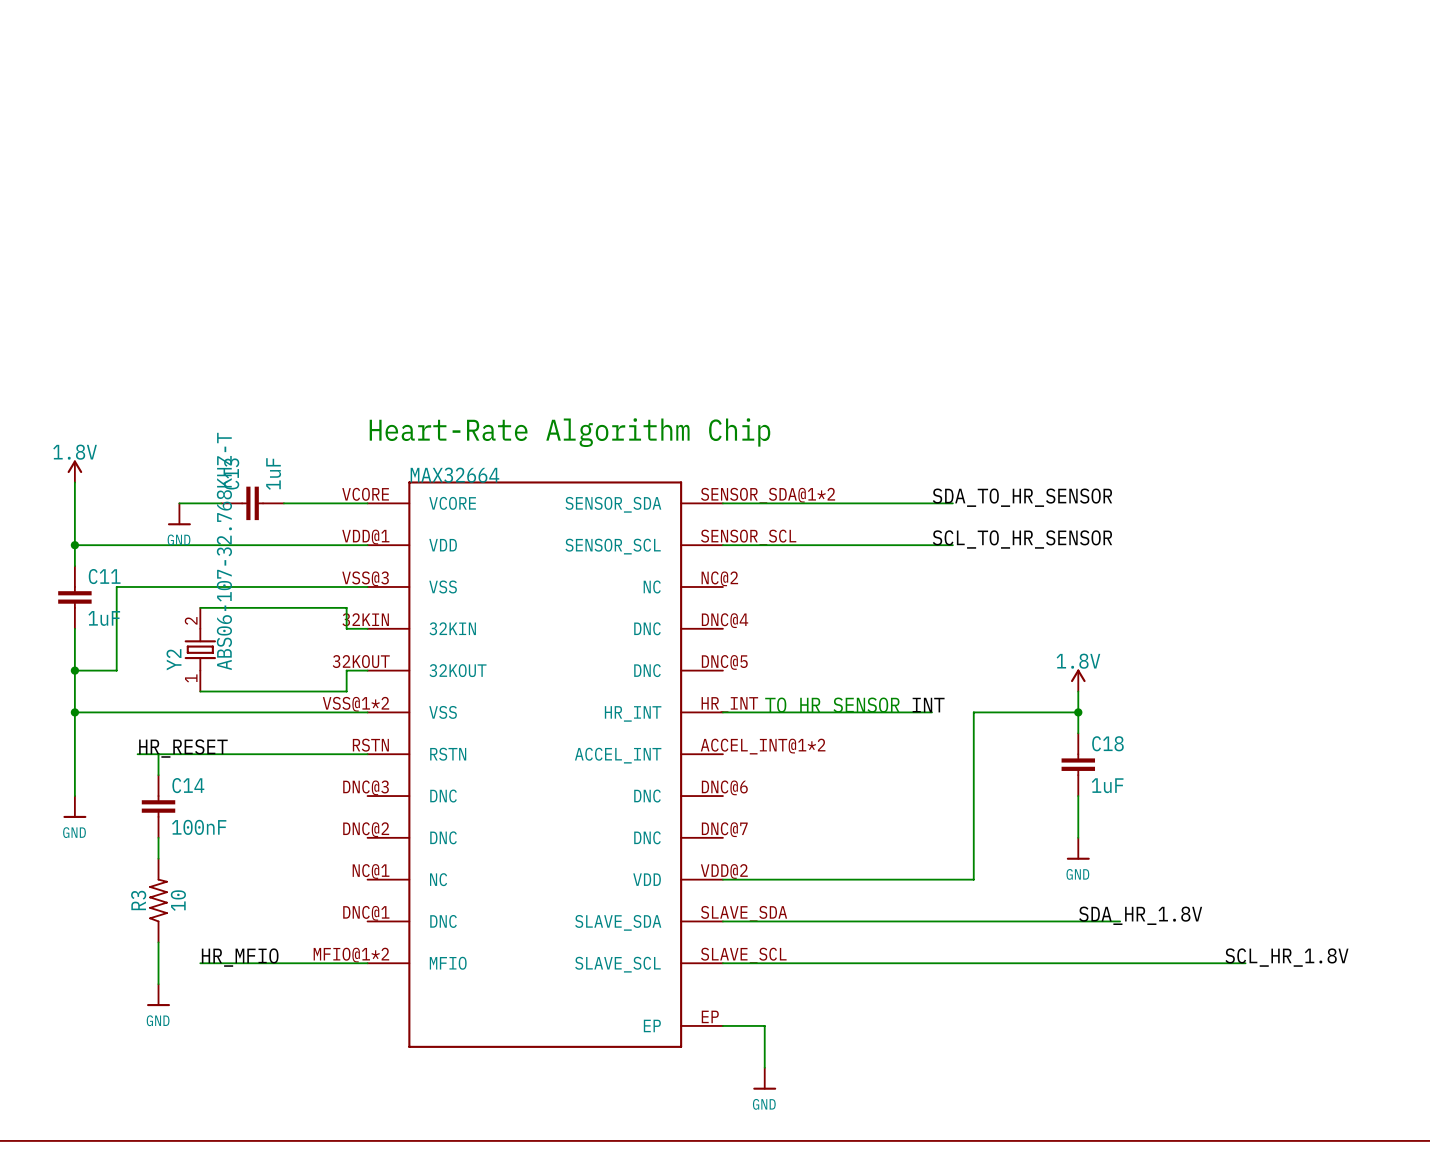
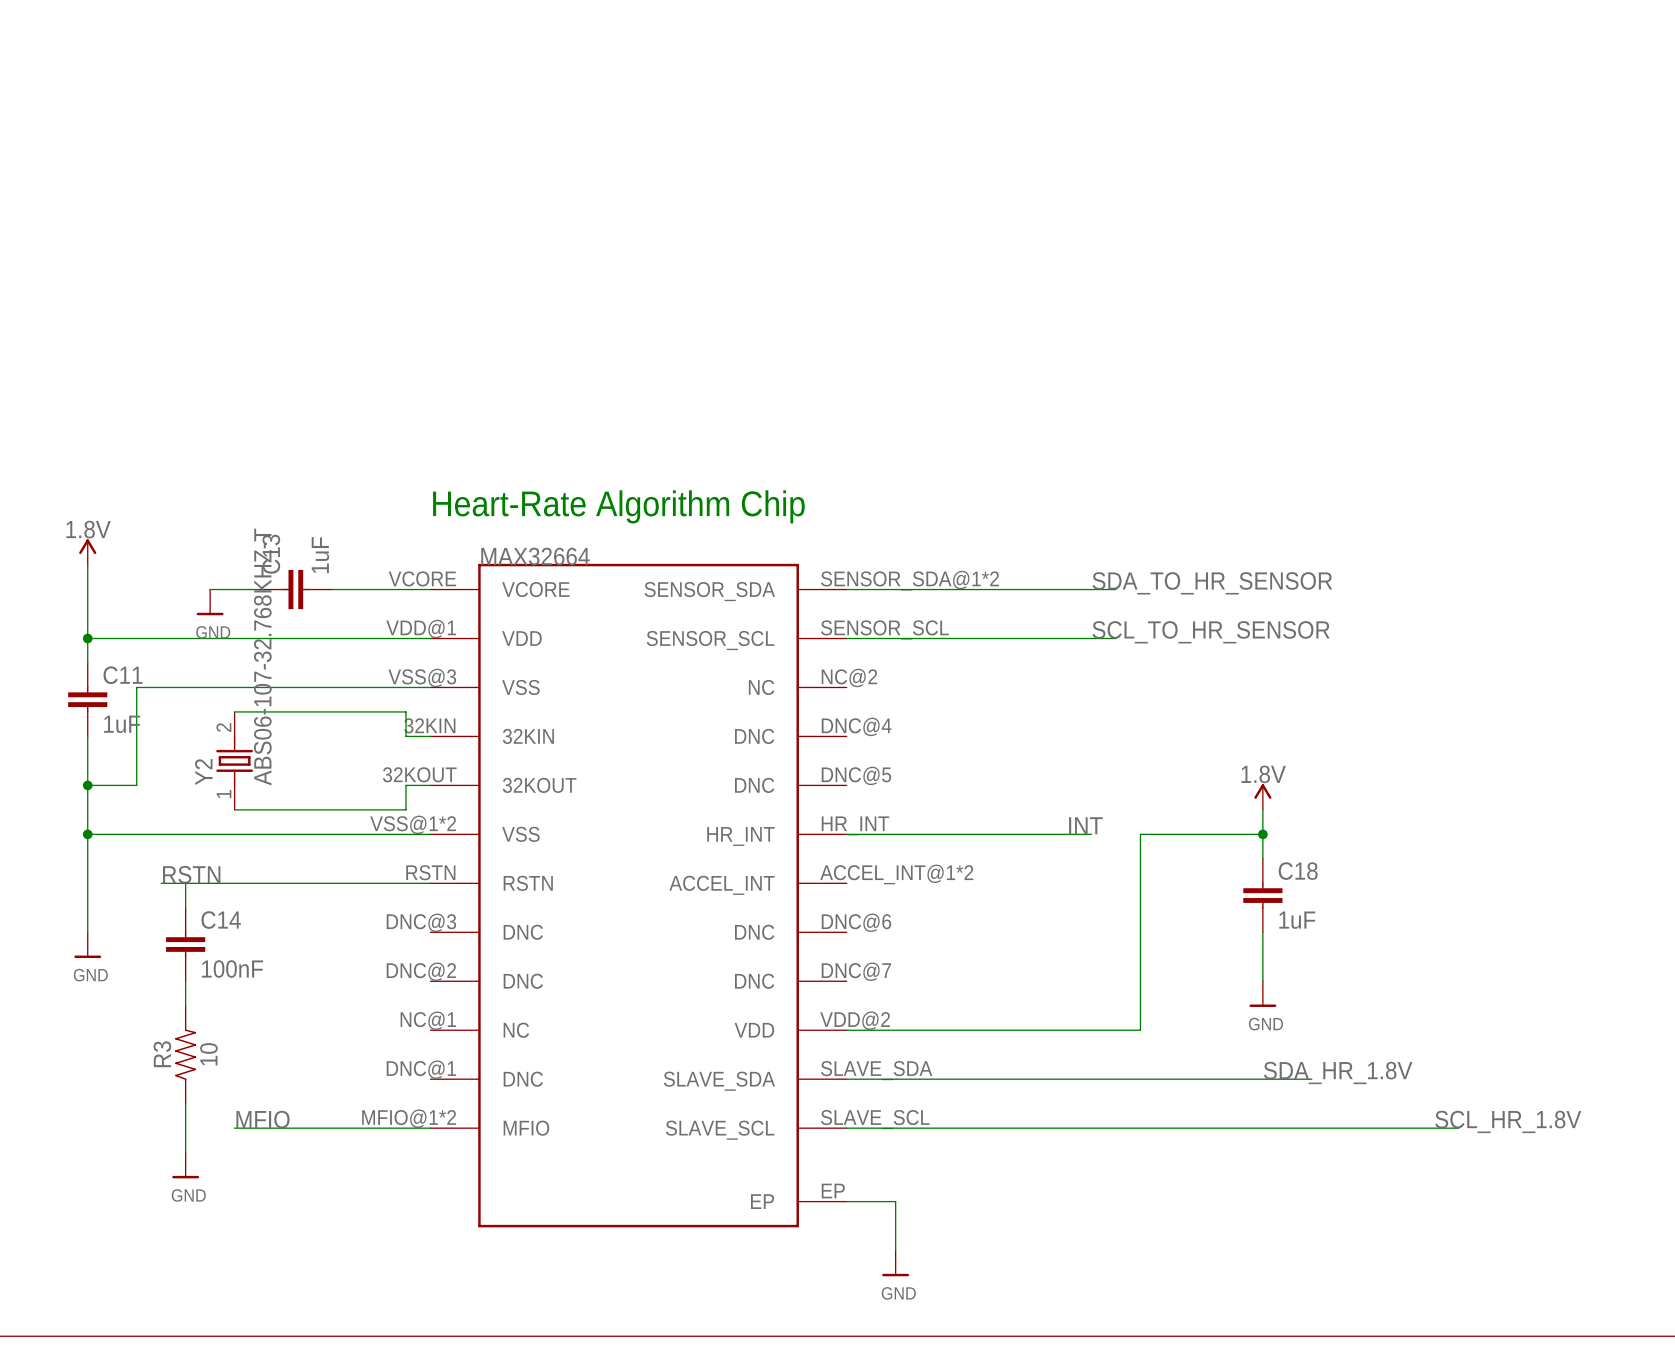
text: TO HR SENSOR (832, 705) -> none
label: HR_RESET (183, 748) -> RSTN (191, 874)
label: HR_MFIO (240, 957) -> MFIO (263, 1119)

